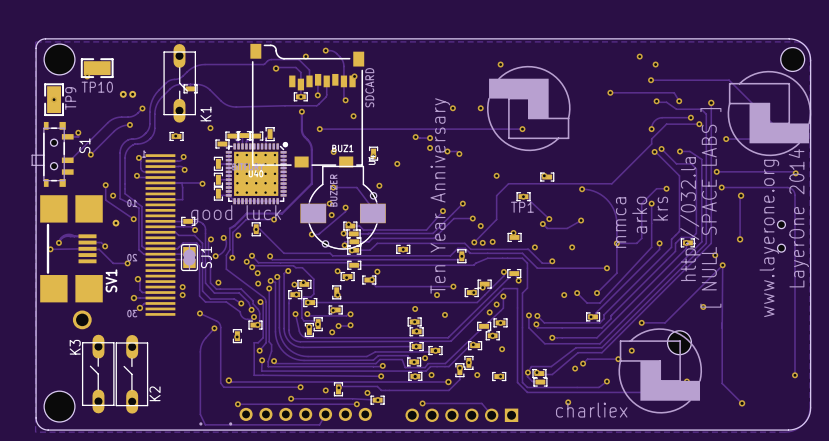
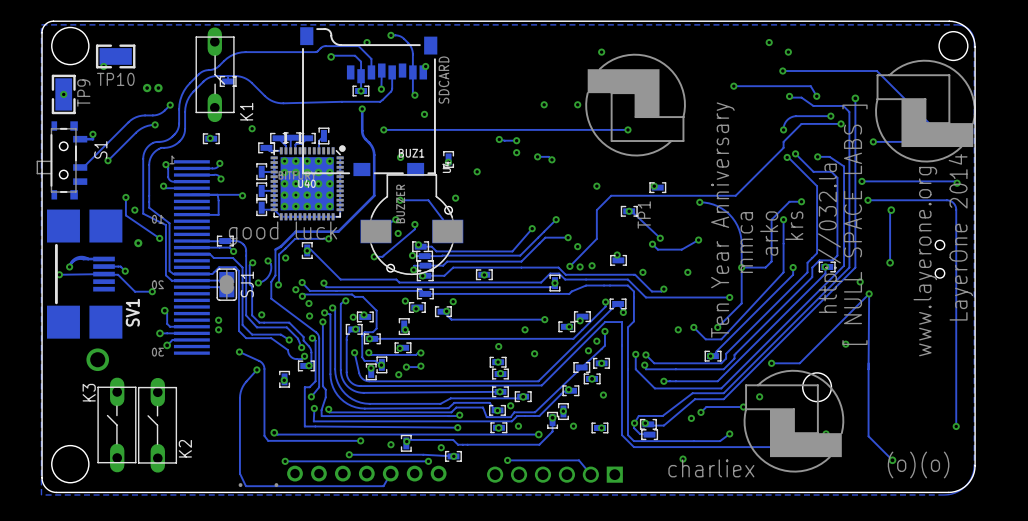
text position: Ten Year Anniversary (440, 196) -> Ten Year Anniversary (722, 220)
TP1 name rotation: 0° (522, 207) -> 90° counterclockwise (644, 214)
text: none -> (o)(o) (918, 464)

